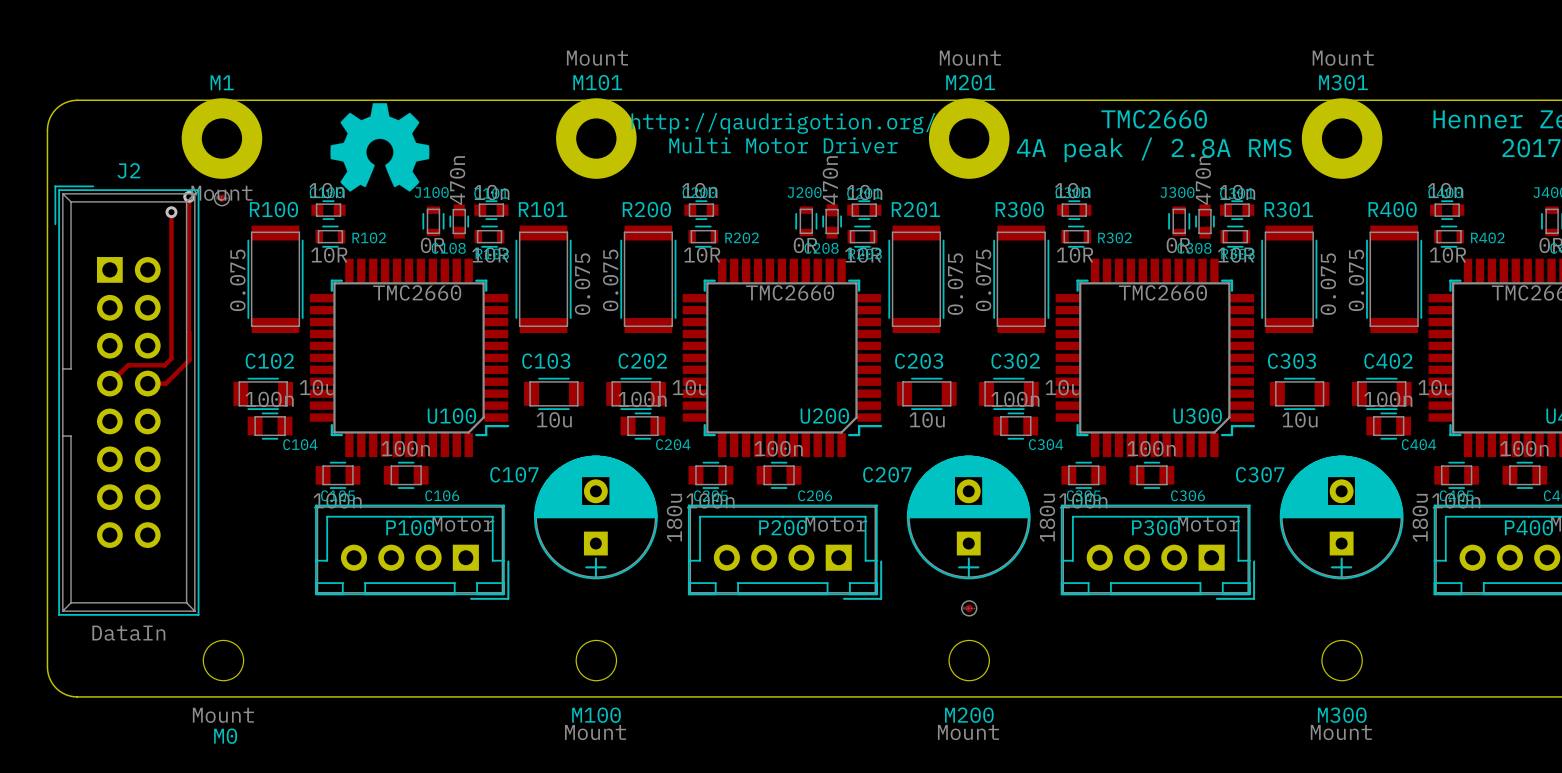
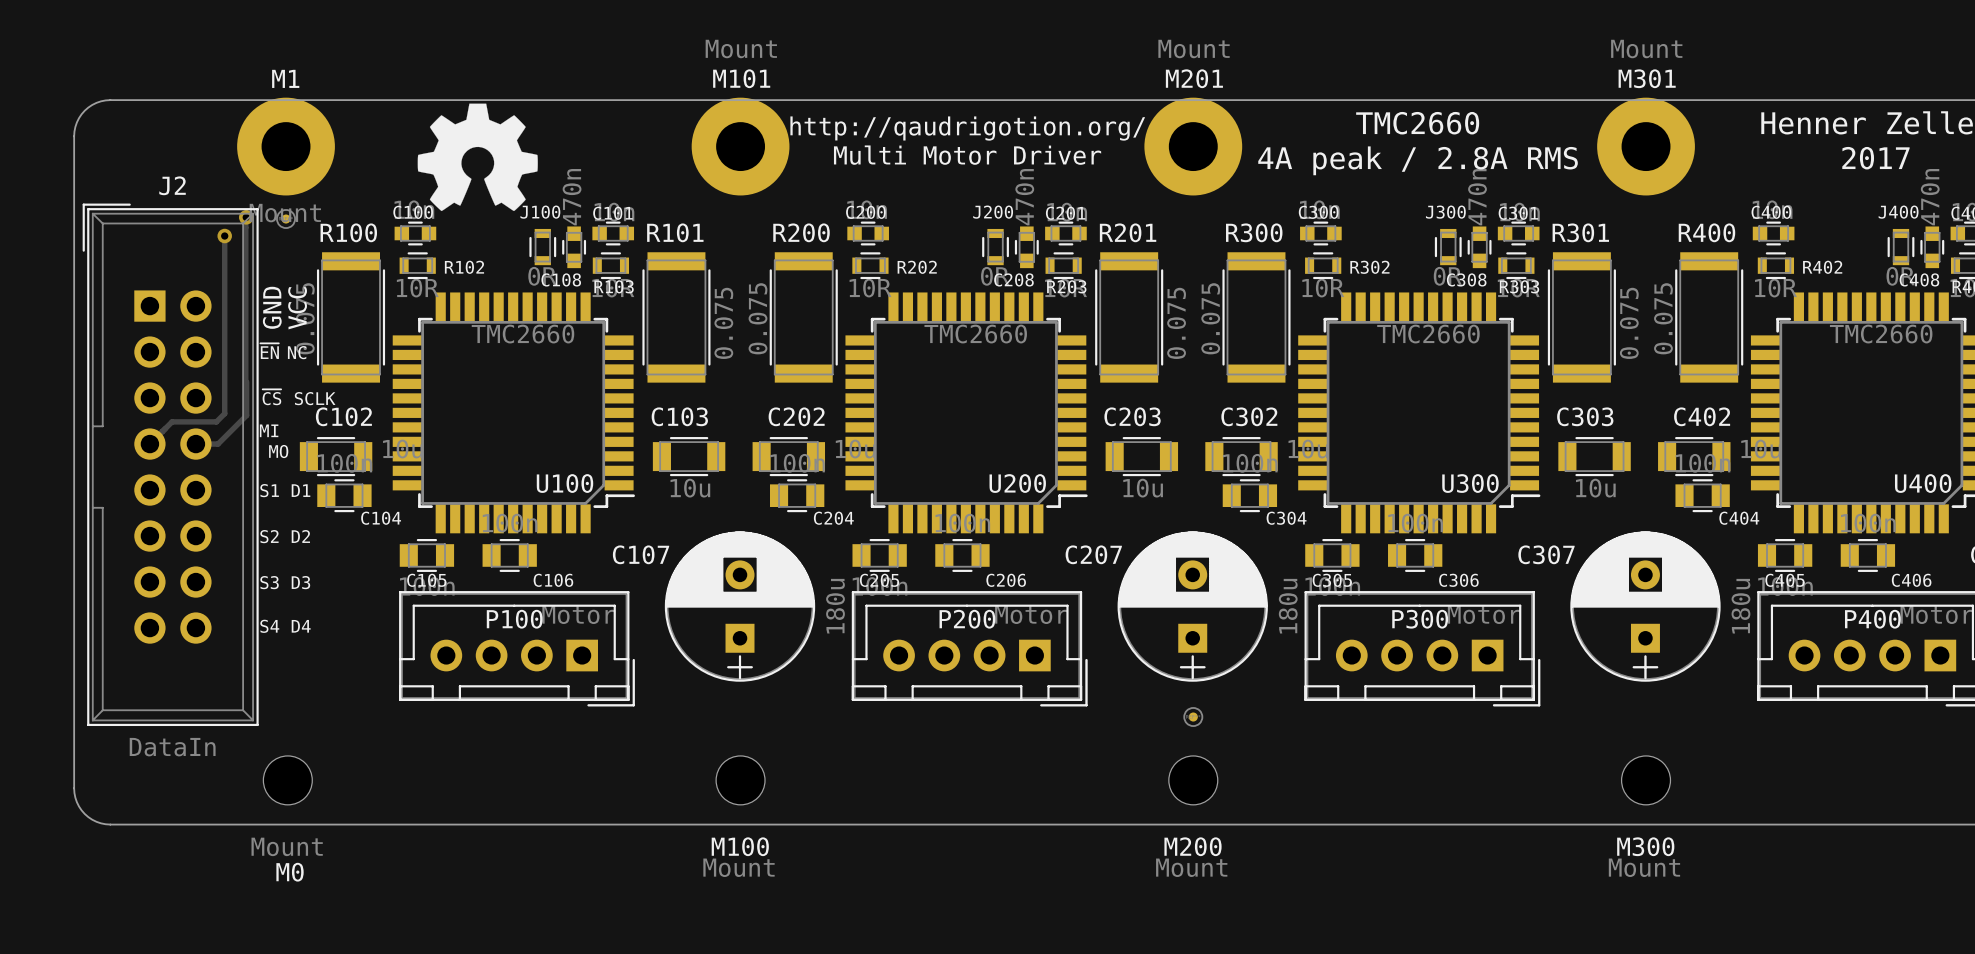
text: none -> GND (272, 307)
text: none -> VCC (297, 308)
text: none -> ~{EN} (269, 351)
text: none -> NC (297, 352)
text: none -> ~{CS} (271, 397)
text: none -> SCLK (315, 398)
text: none -> MI (269, 430)
text: none -> MO (278, 451)
text: none -> S1 D1 (285, 490)
text: none -> S2 D2 (285, 536)
text: none -> S3 D3 (285, 582)
text: none -> S4 D4 (285, 626)

